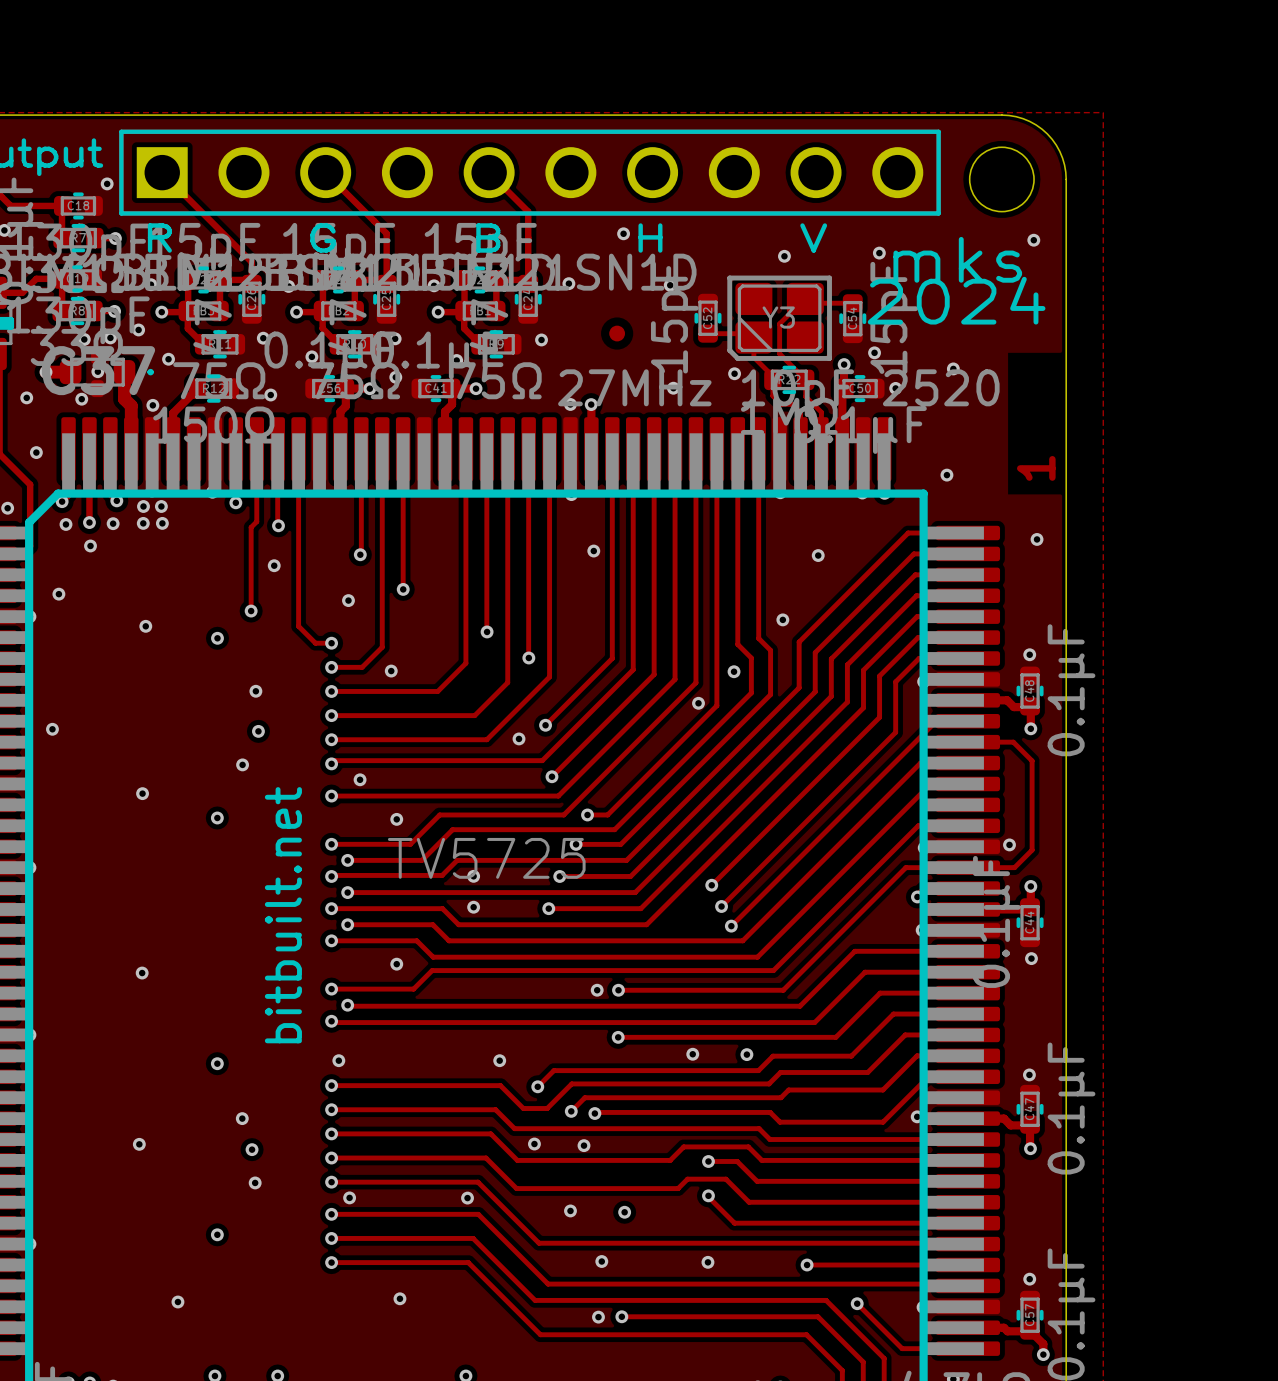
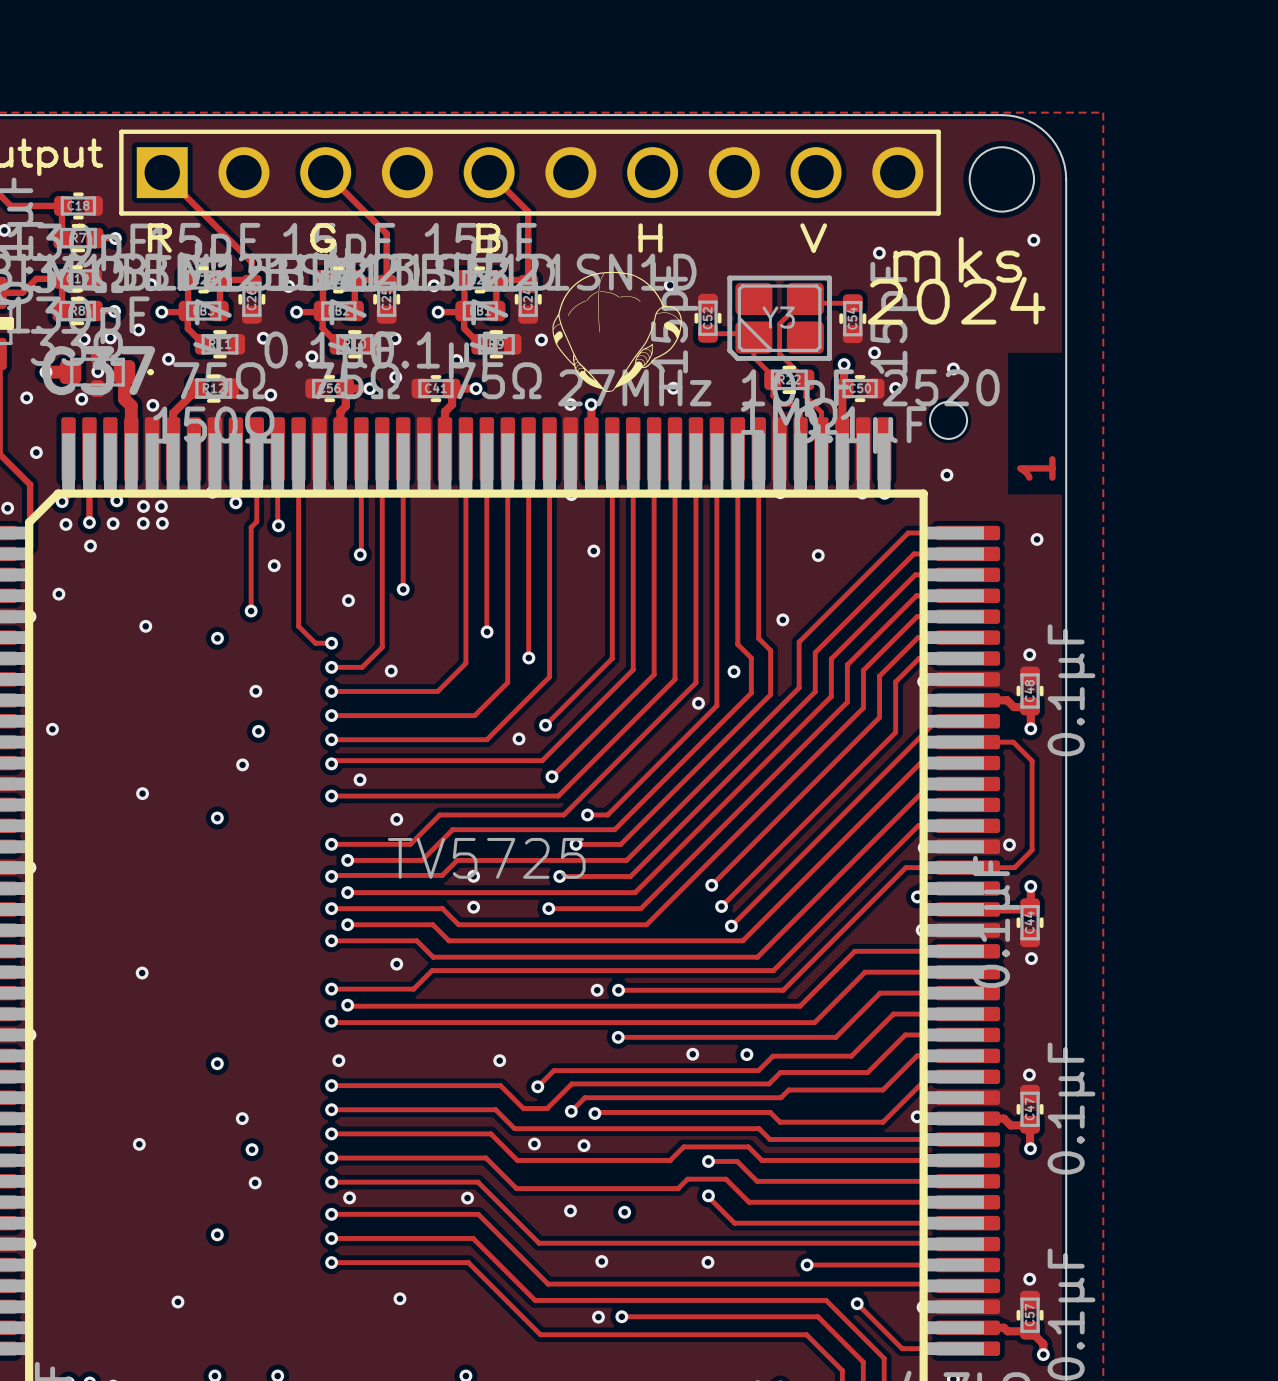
via: (107, 183) -> none
via: (623, 233) -> none
via: (784, 256) -> none
drawing: none -> [567, 273, 641, 333]
via: (568, 283) -> none
drawing shape: [609, 325, 626, 342] -> [552, 271, 682, 392]
via: (734, 373) -> none
round board edge: none -> [929, 401, 968, 440]
text: bitbuilt.net (283, 915) -> none

